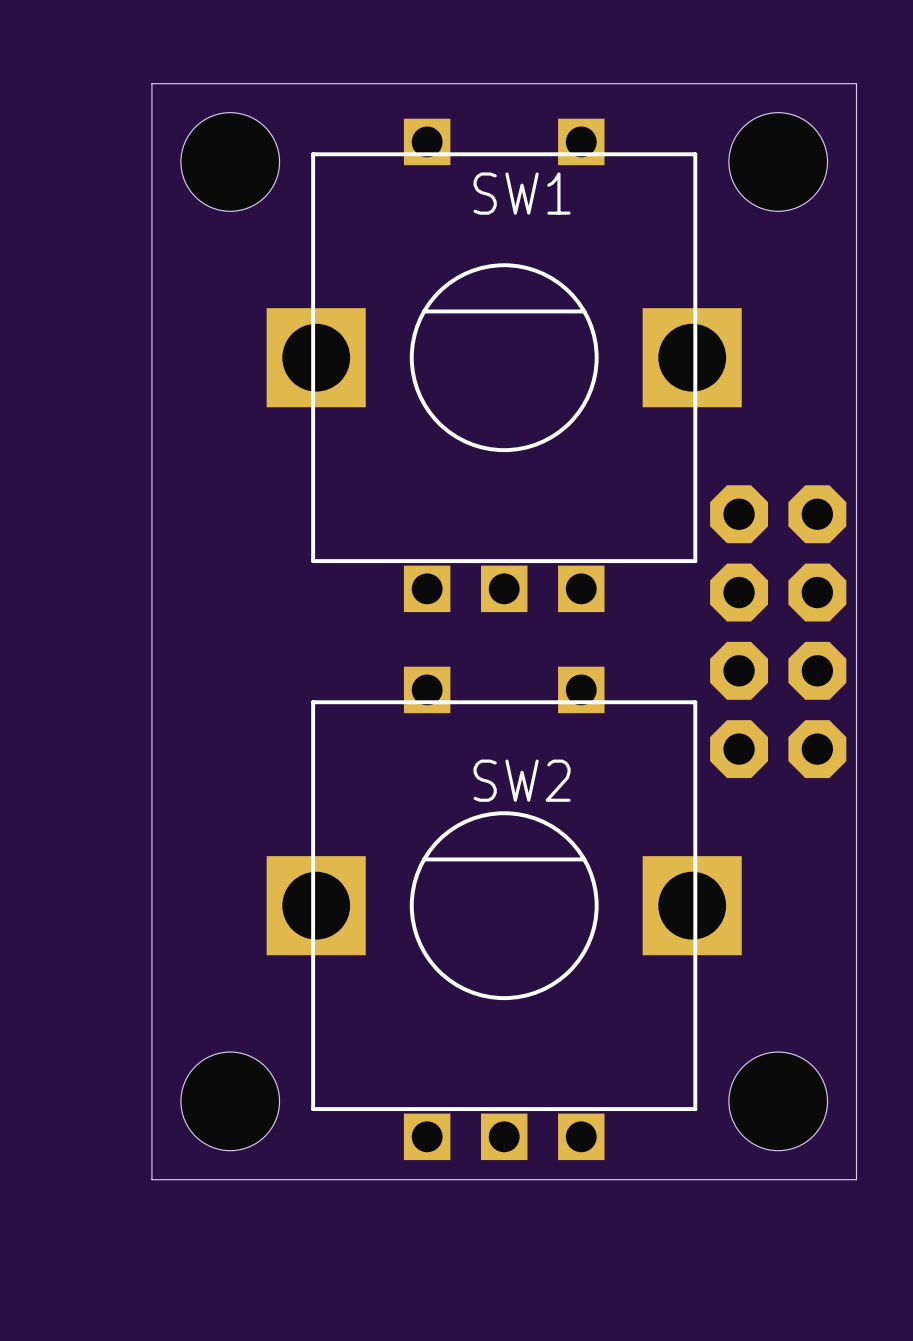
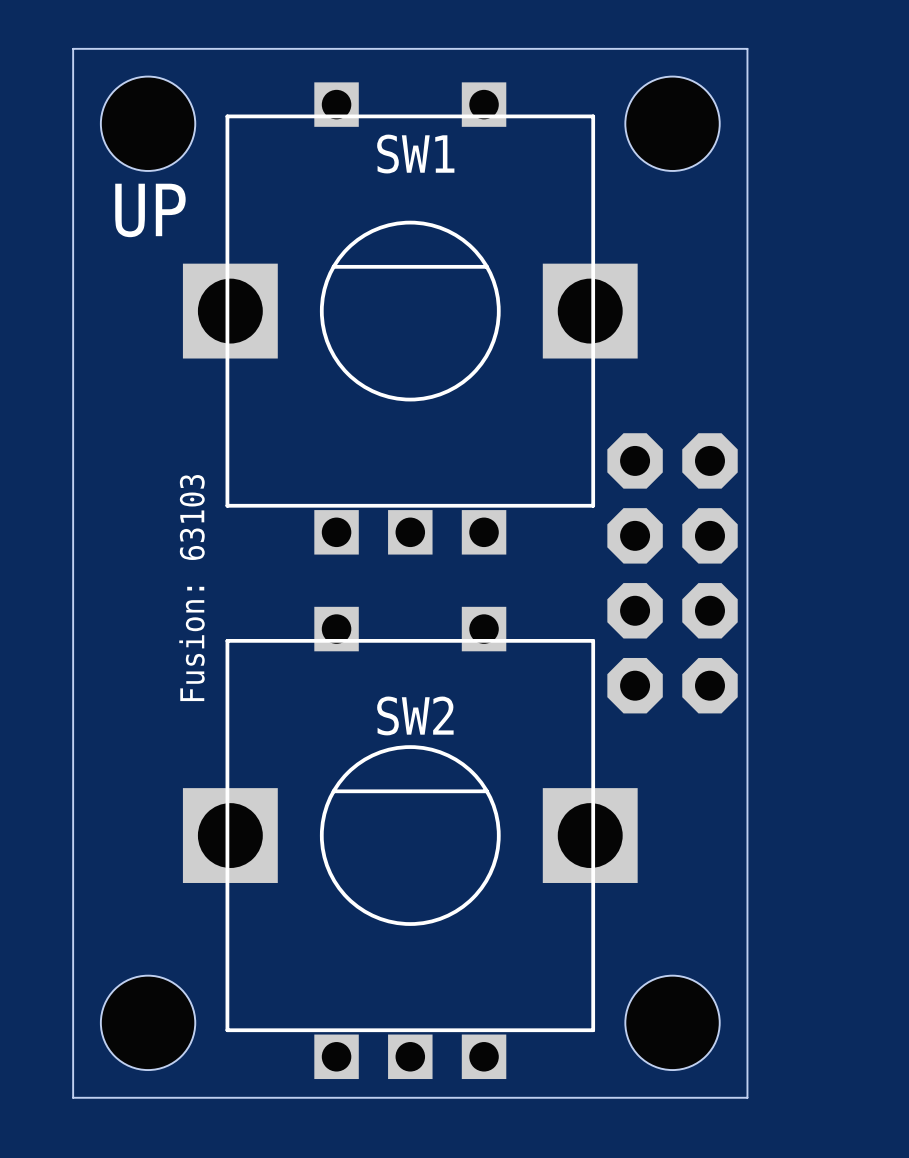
text: none -> UP (150, 210)
text: none -> Fusion: 63103 (191, 588)

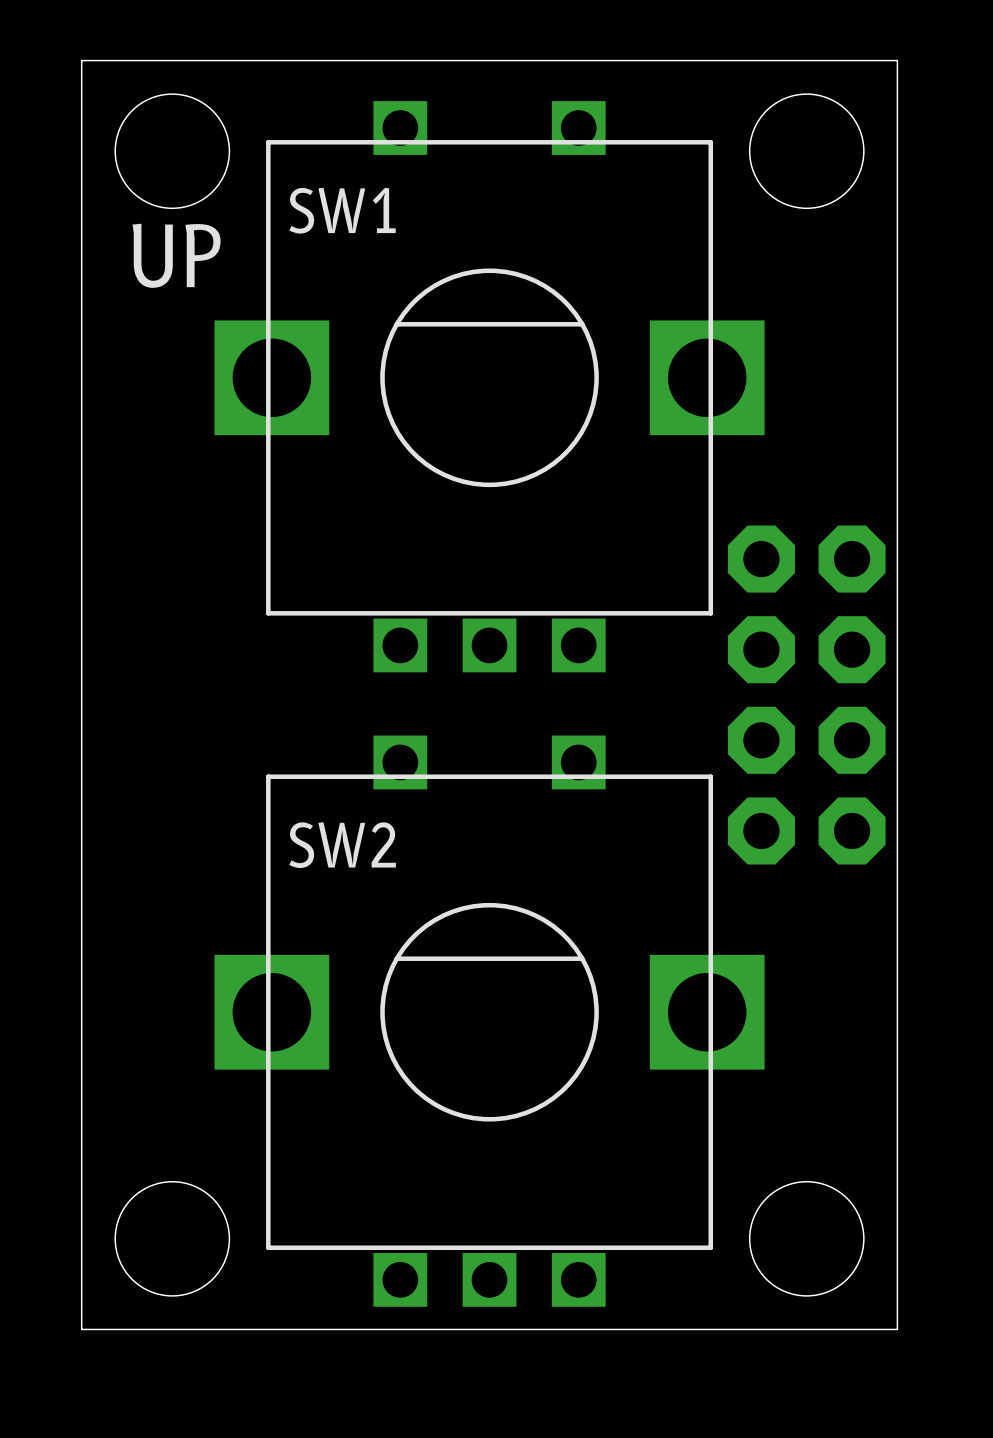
SW1 name position: SW1 (415, 154) -> SW1 (342, 210)
text: Fusion: 63103 (191, 588) -> none
SW2 name position: SW2 (415, 715) -> SW2 (342, 845)

